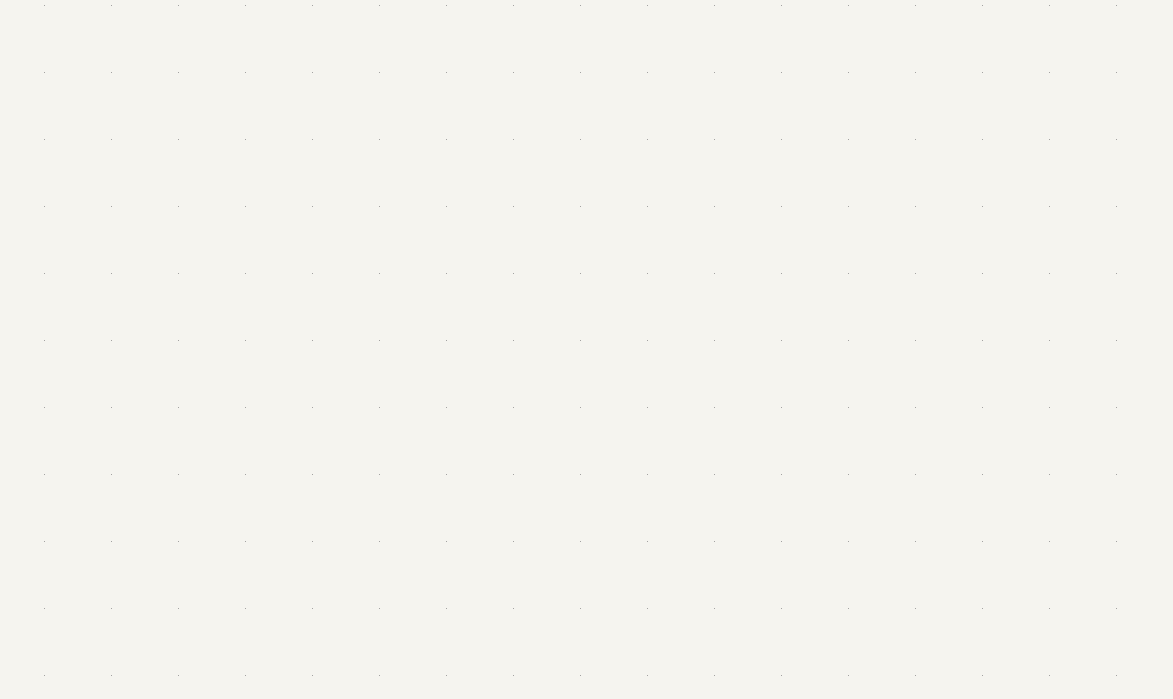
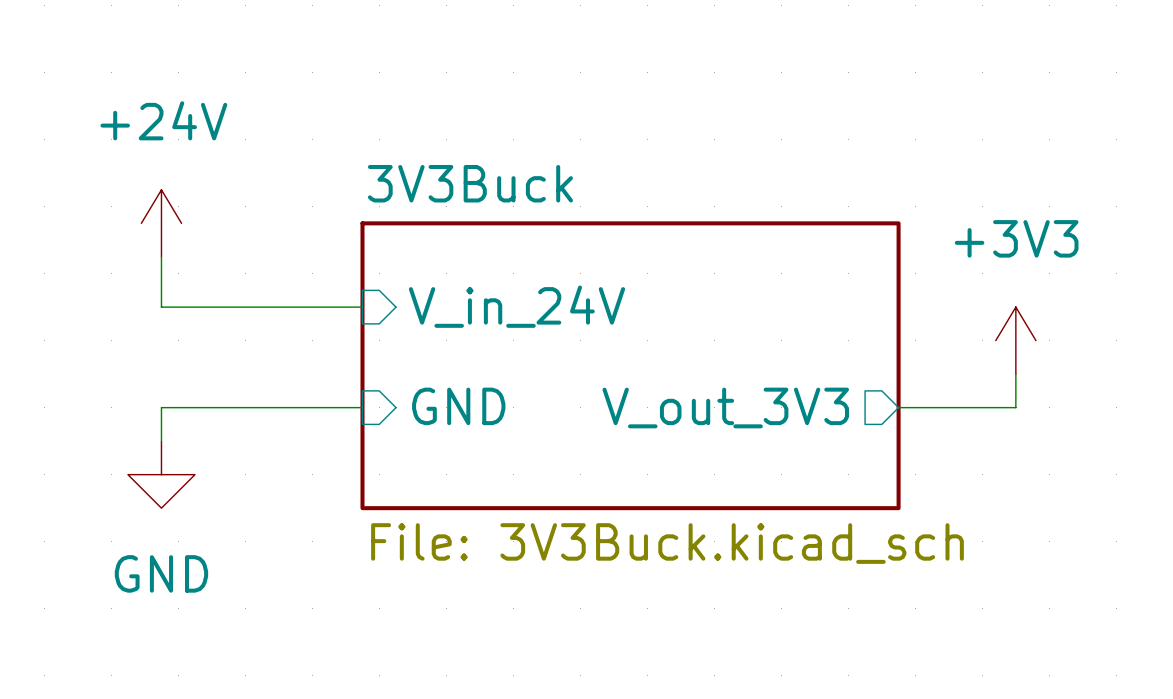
power symbol: none -> +24V (161, 223)
wire: none -> (161, 256) (161, 307) (362, 307)
sheet pin: none -> V_in_24V (516, 306)
power symbol: none -> +3V3 (1015, 340)
sheet 3V3Buck: none -> File: 3V3Buck.kicad_sch (630, 365)
wire: none -> (1015, 374) (1015, 407) (898, 407)
sheet pin: none -> GND (458, 406)
wire: none -> (362, 407) (161, 407) (161, 441)
sheet pin: none -> V_out_3V3 (725, 407)
power symbol: none -> GND (161, 474)

